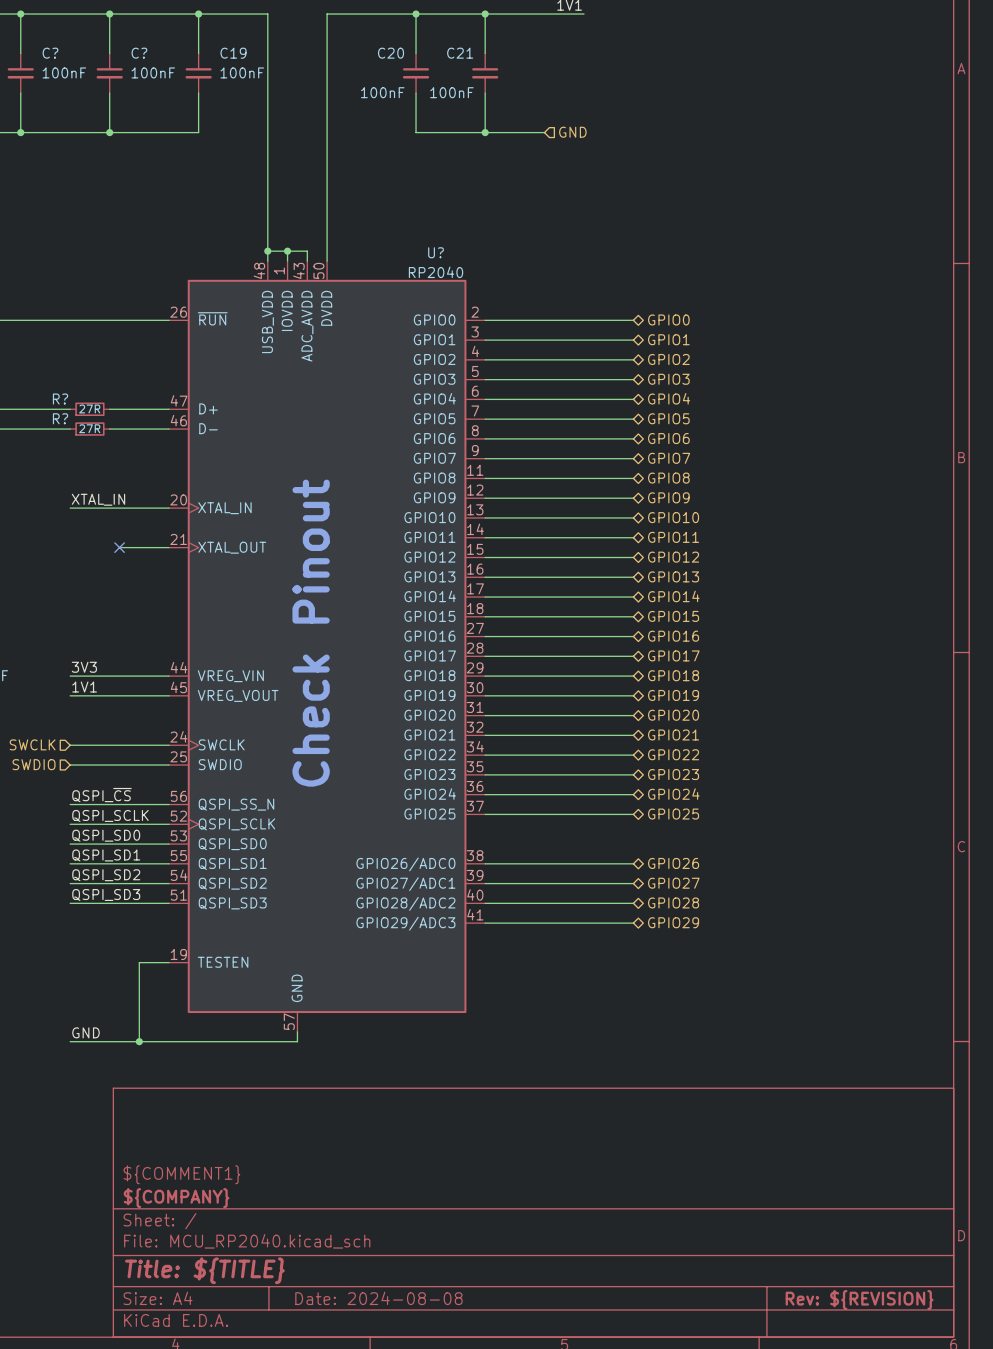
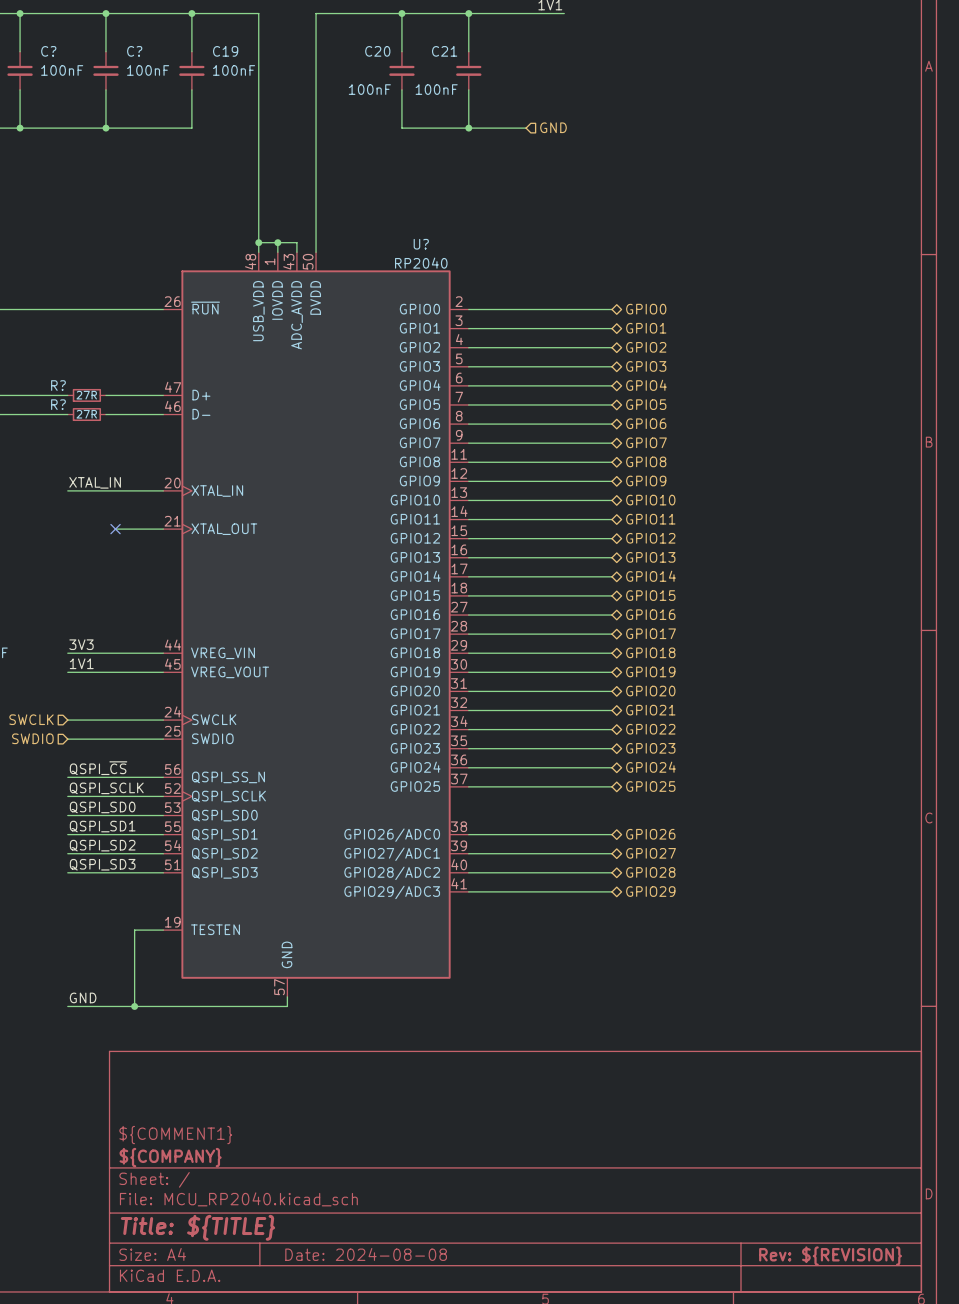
text: Check Pinout (311, 633) -> none

